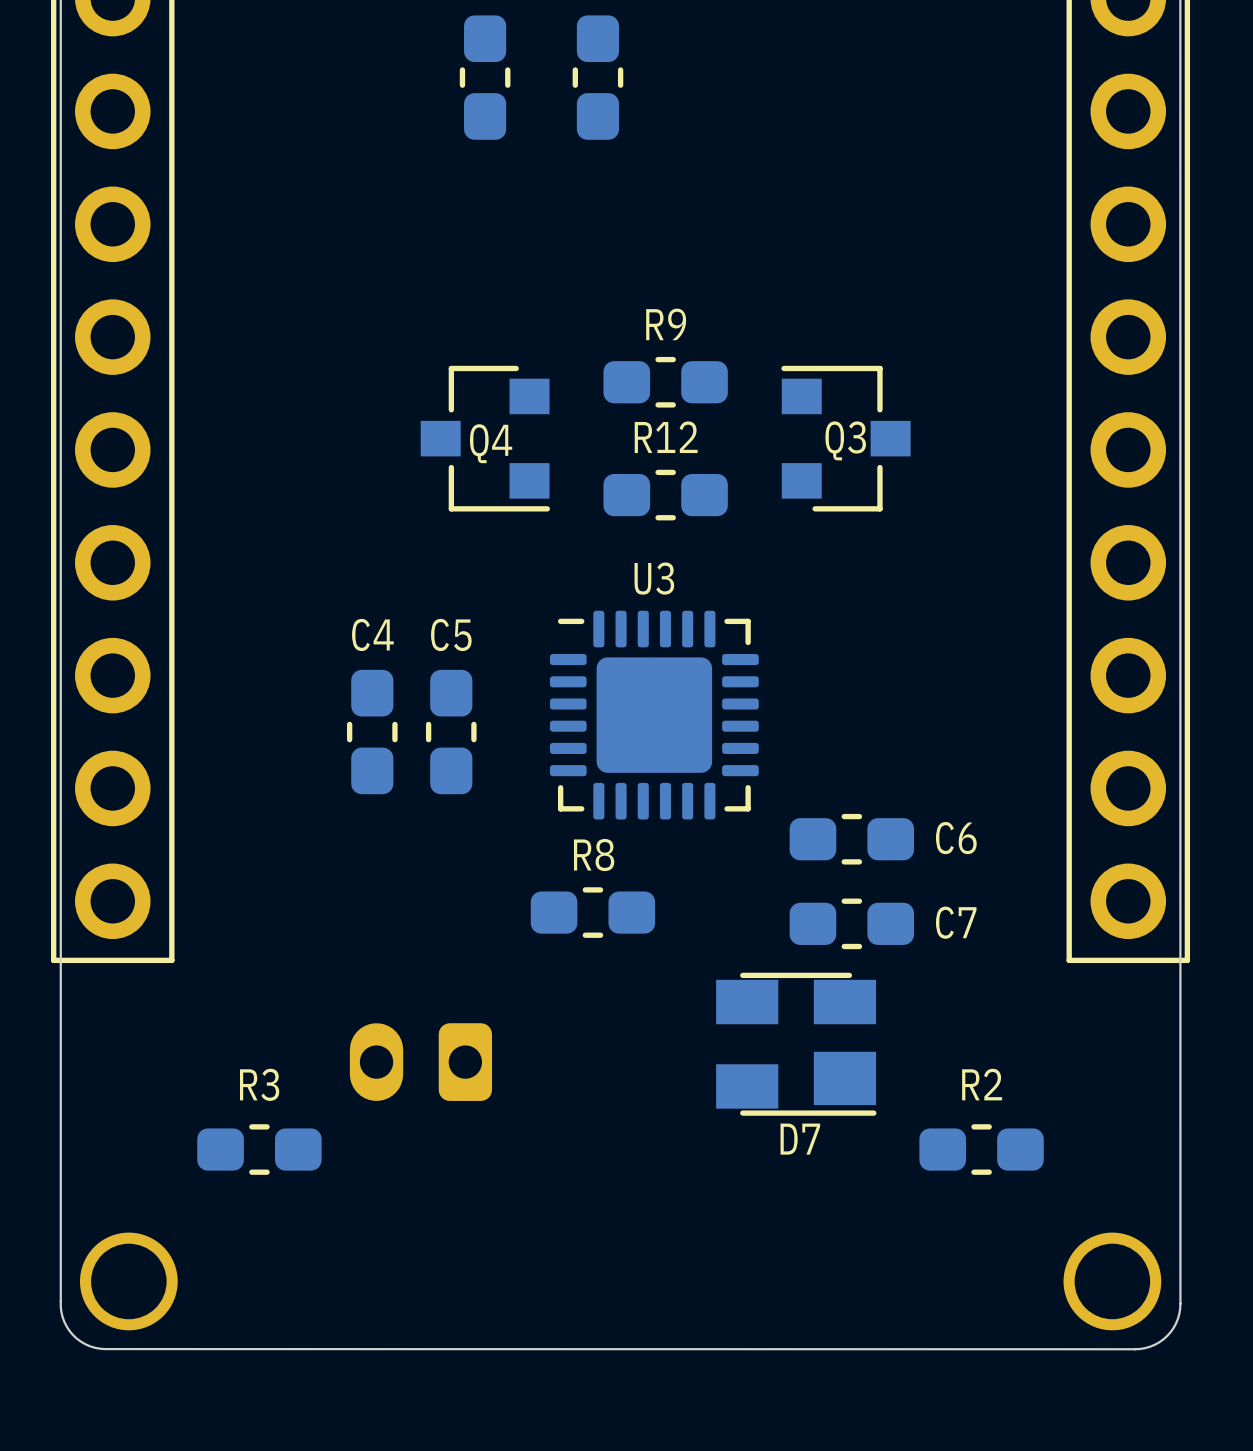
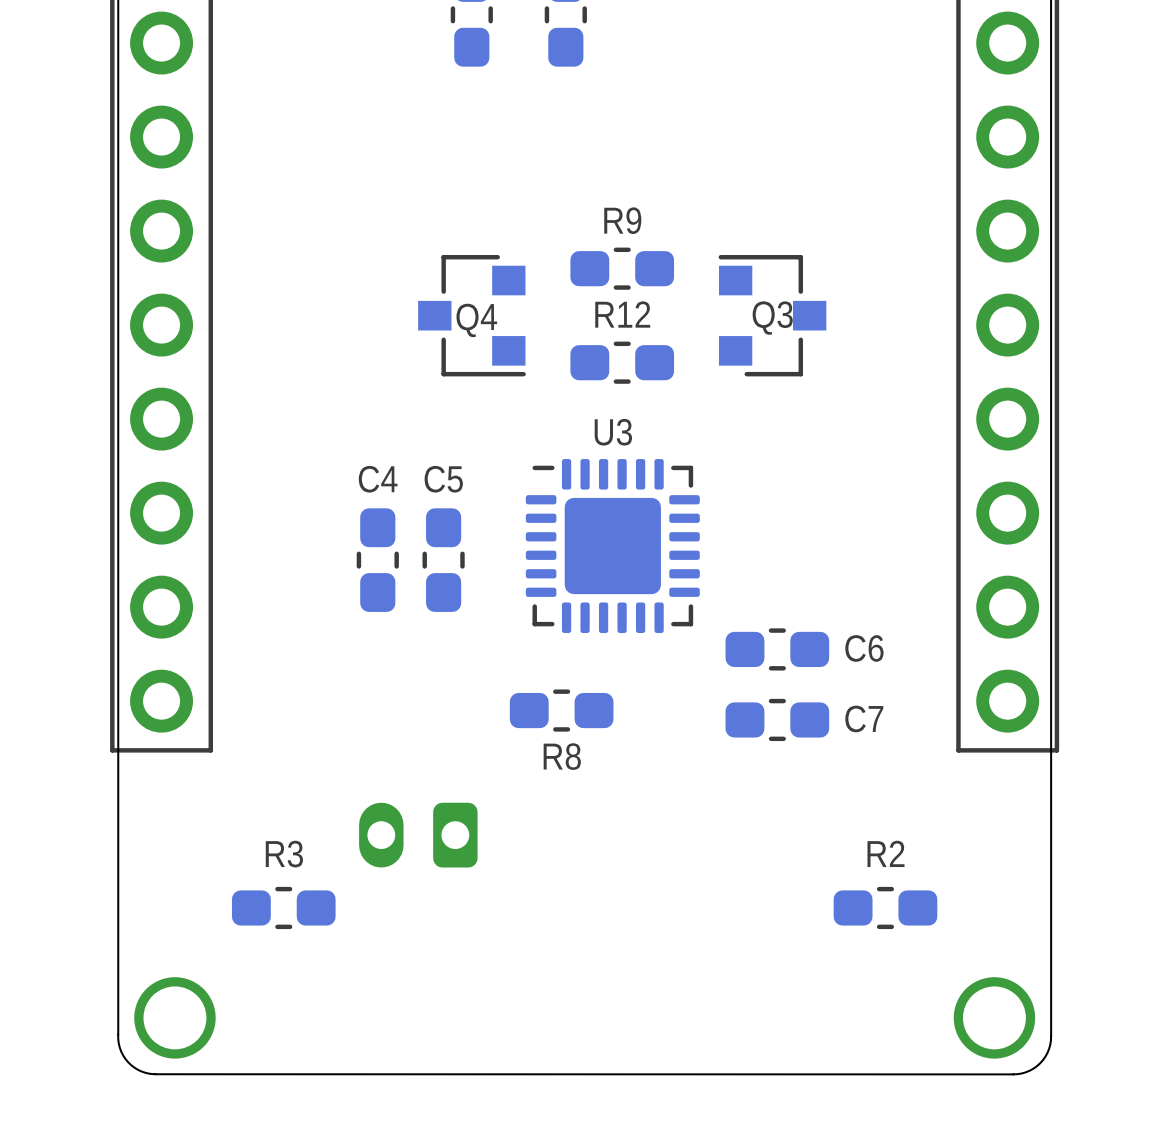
R8 name position: R8 (594, 854) -> R8 (562, 756)
D7: (796, 1044) -> none

